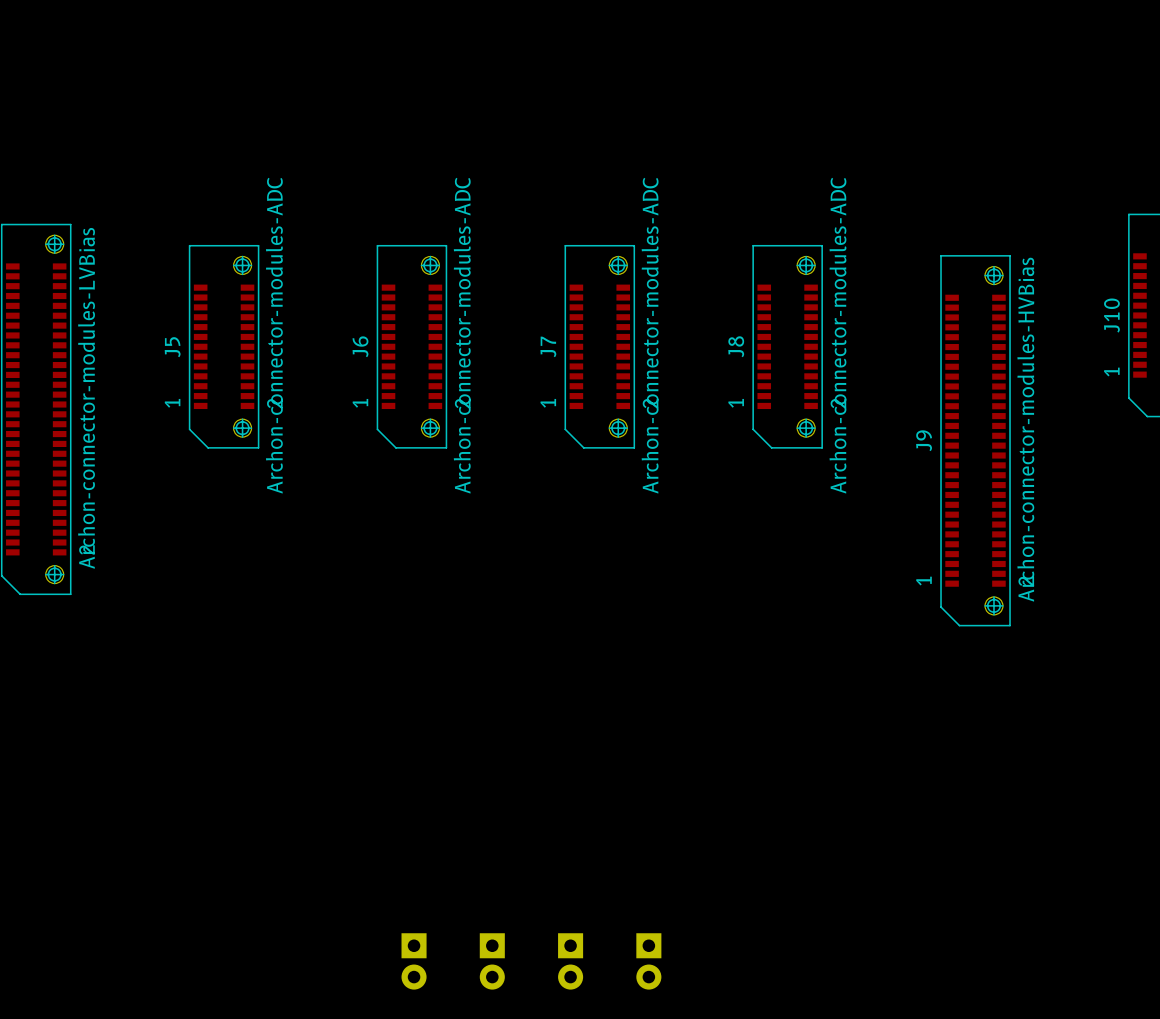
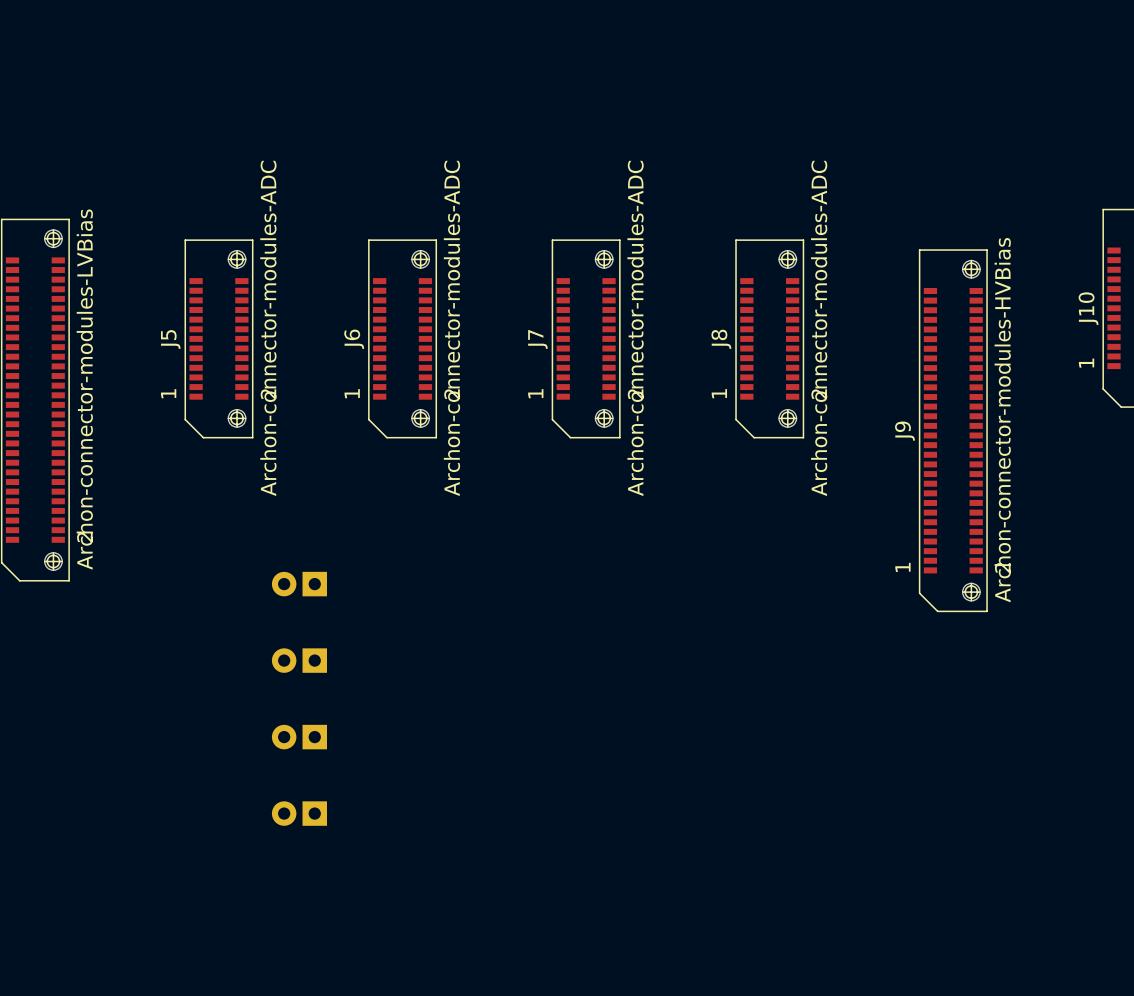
part: none -> (299, 584)
part: none -> (299, 660)
part: none -> (299, 737)
part: none -> (299, 813)
part: (414, 961) -> none
part: (492, 961) -> none
part: (570, 961) -> none
part: (648, 961) -> none

